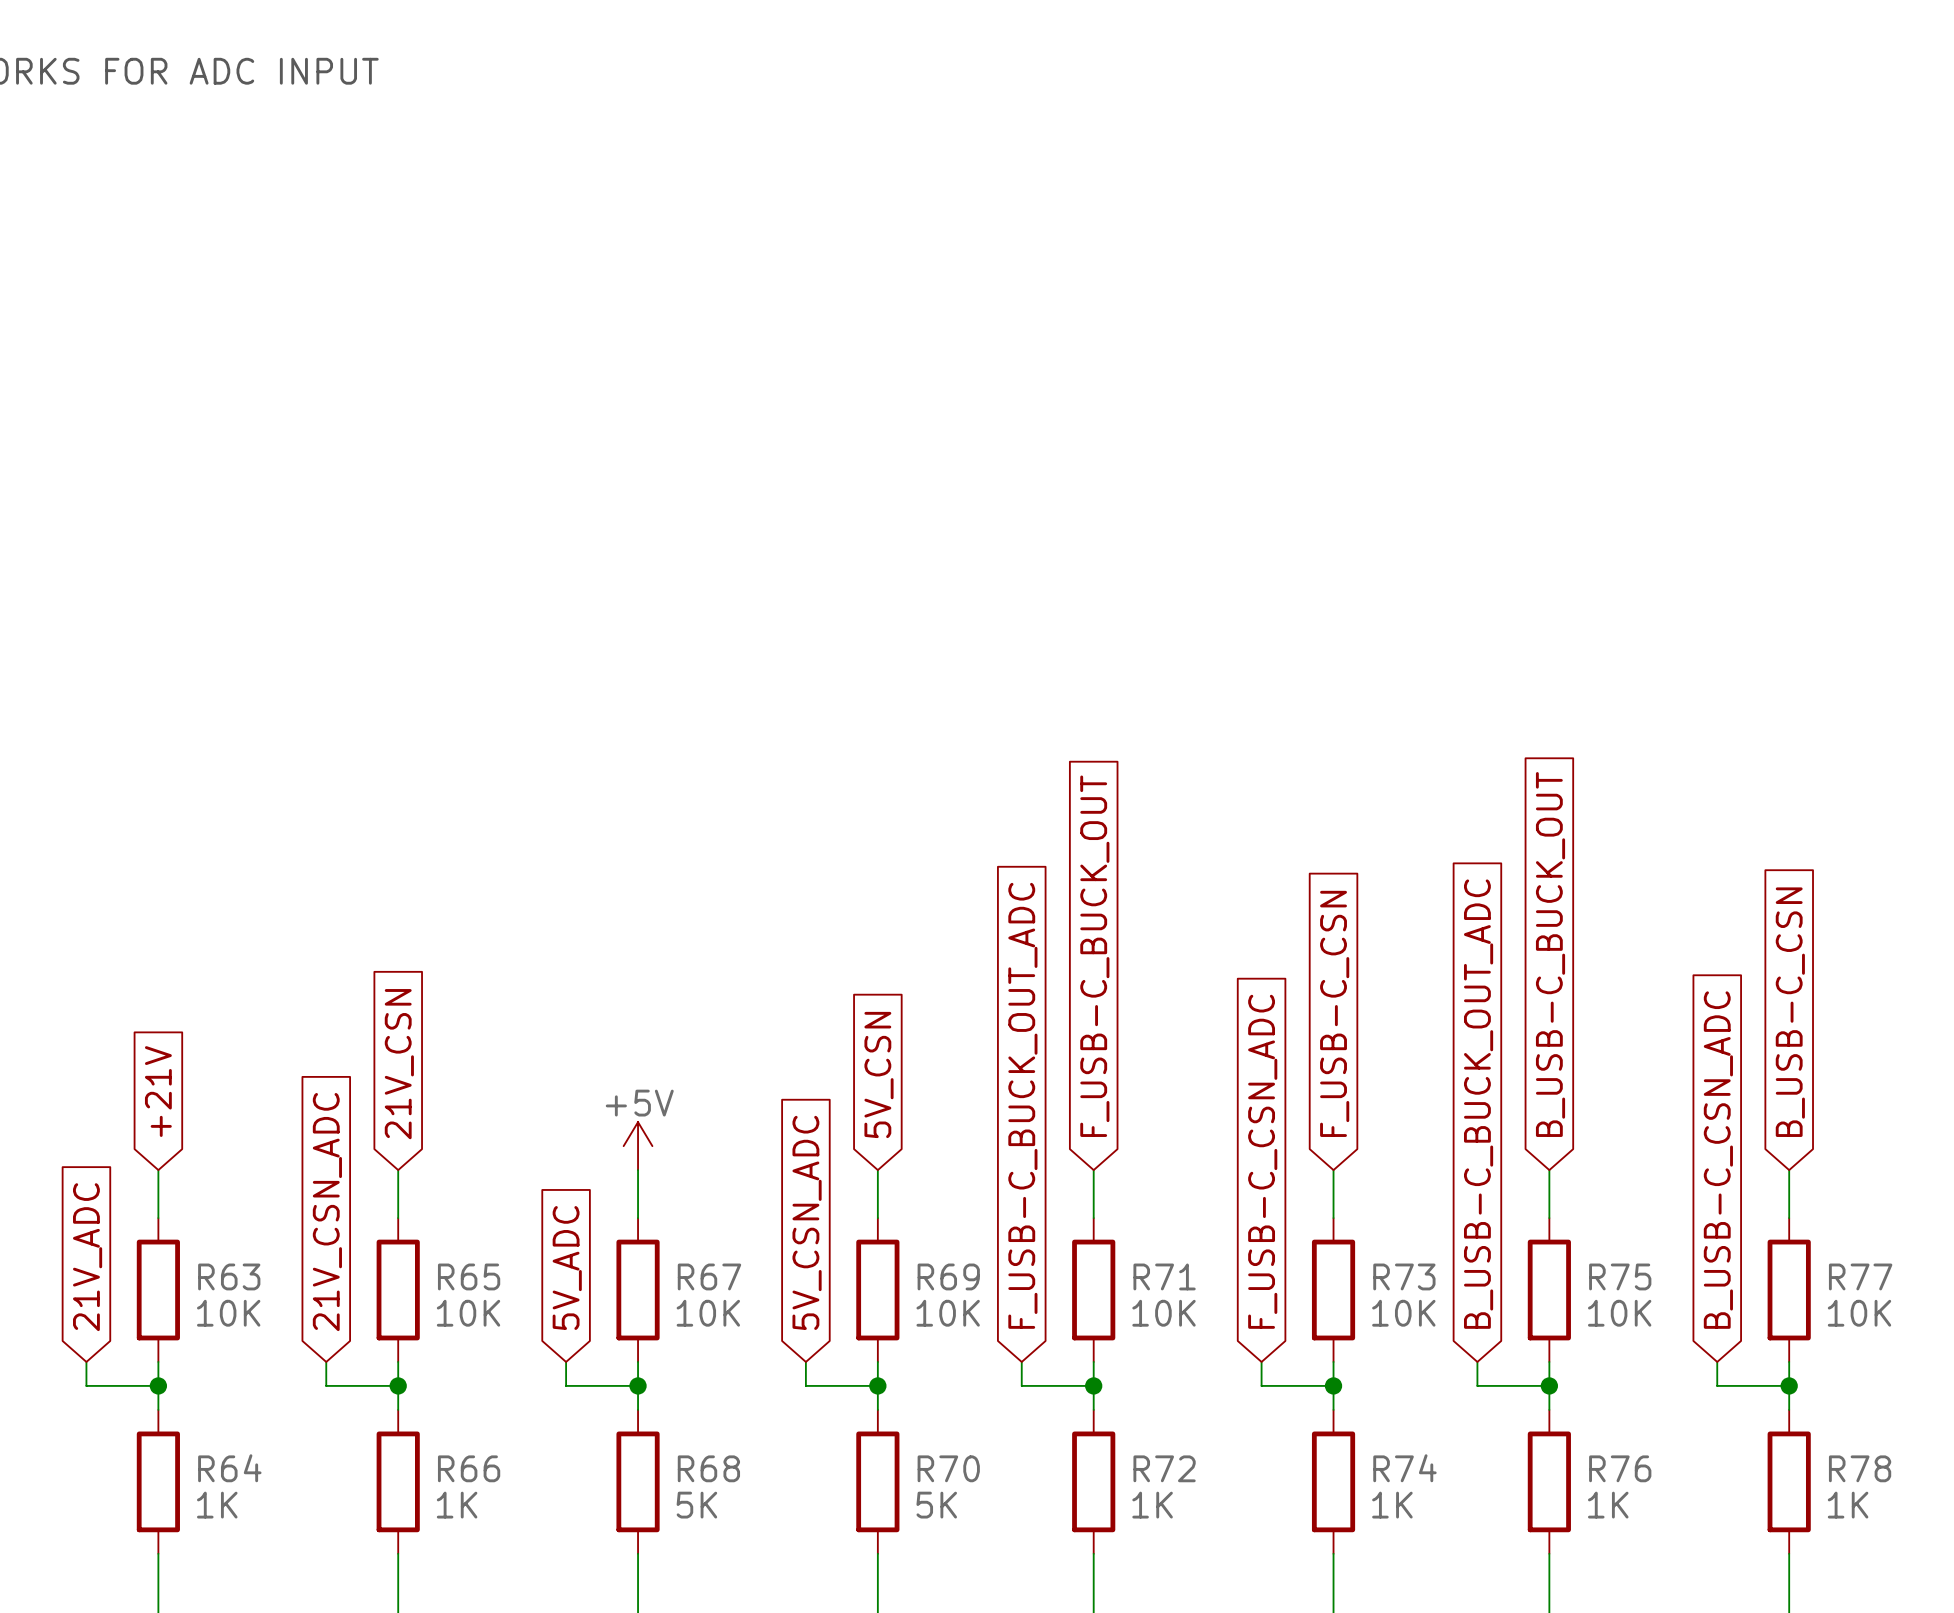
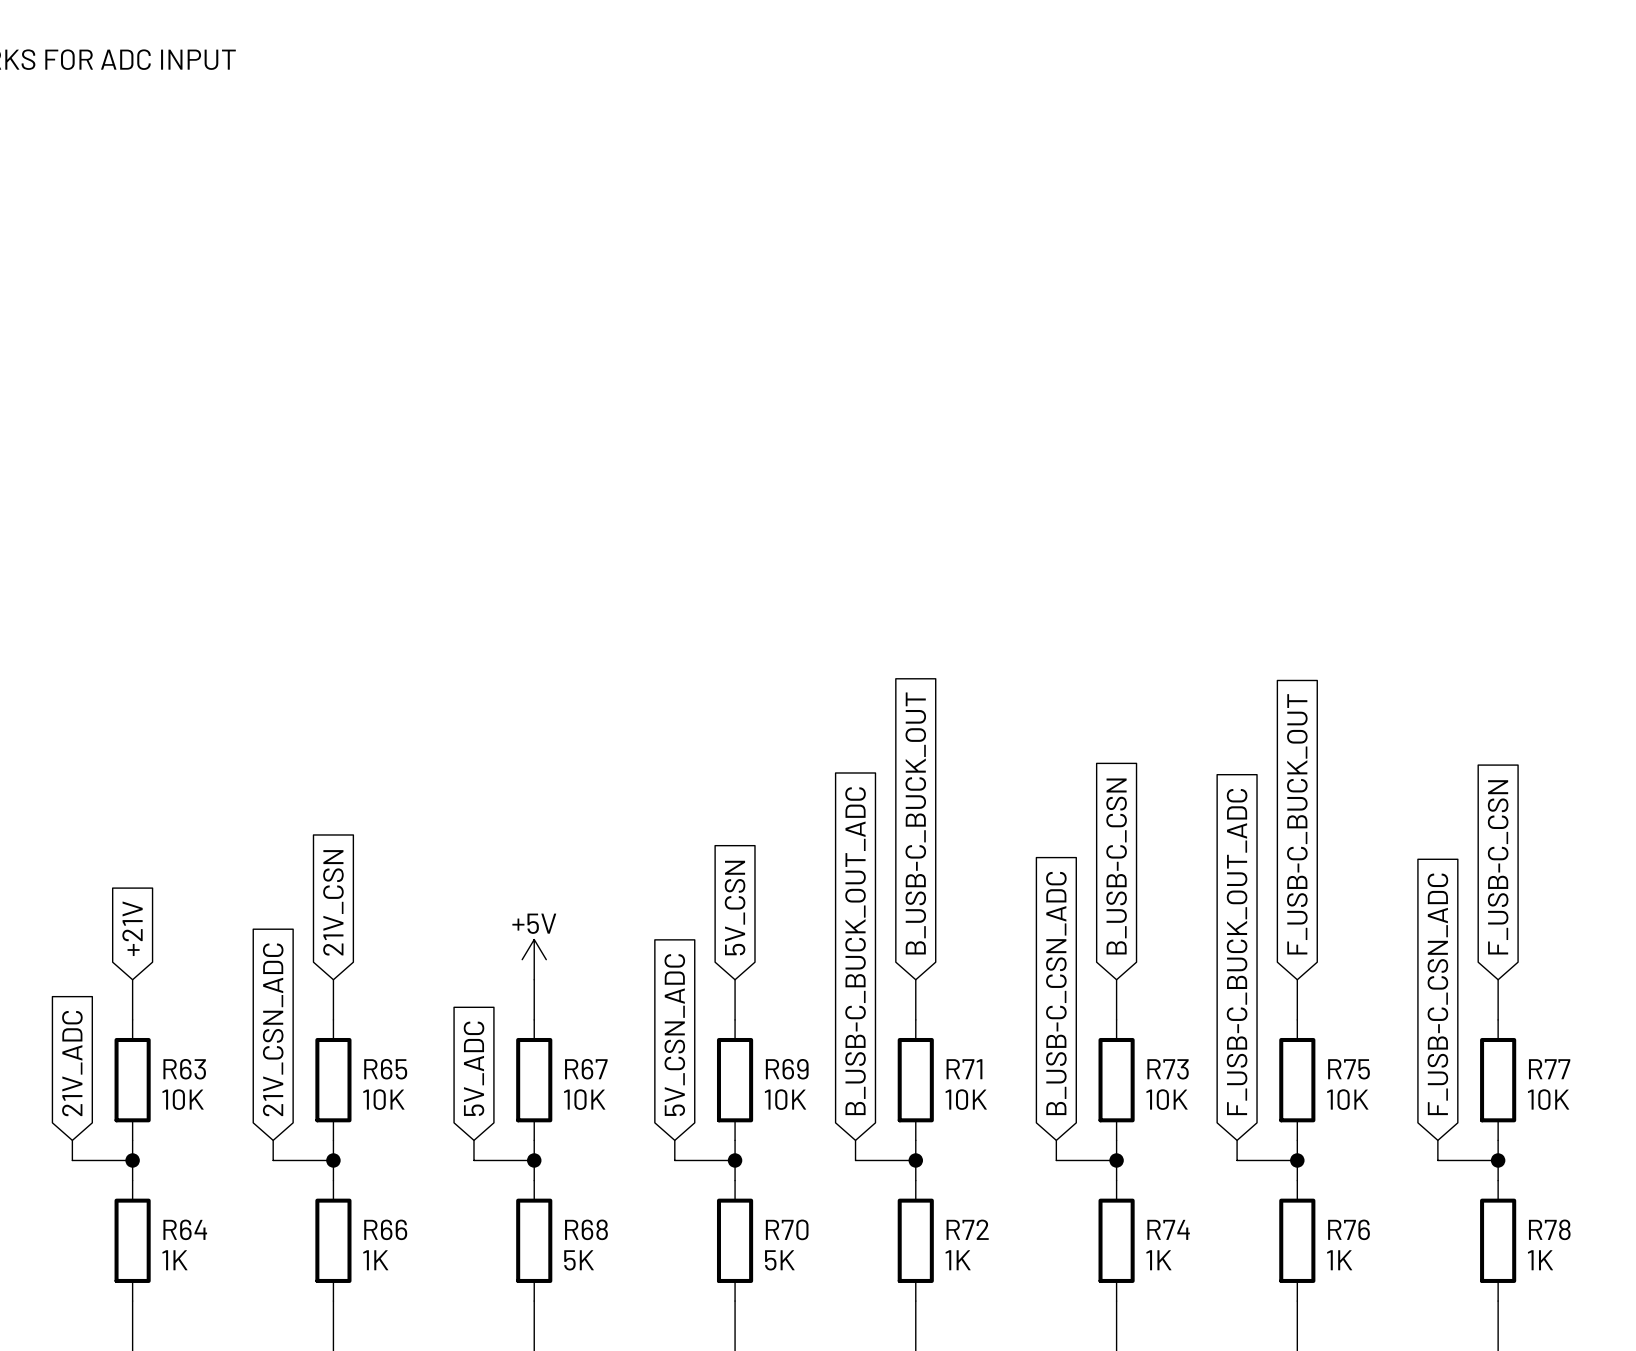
global label: B_USB-C_BUCK_OUT (1550, 954) -> F_USB-C_BUCK_OUT (1297, 824)
global label: F_USB-C_BUCK_OUT (1094, 956) -> B_USB-C_BUCK_OUT (915, 823)
global label: B_USB-C_CSN (1790, 1012) -> F_USB-C_CSN (1498, 867)
global label: F_USB-C_CSN (1334, 1013) -> B_USB-C_CSN (1116, 866)
global label: B_USB-C_BUCK_OUT_ADC (1478, 1104) -> F_USB-C_BUCK_OUT_ADC (1237, 952)
global label: F_USB-C_BUCK_OUT_ADC (1022, 1105) -> B_USB-C_BUCK_OUT_ADC (855, 951)
global label: B_USB-C_CSN_ADC (1718, 1160) -> F_USB-C_CSN_ADC (1437, 994)
global label: F_USB-C_CSN_ADC (1262, 1161) -> B_USB-C_CSN_ADC (1056, 993)

